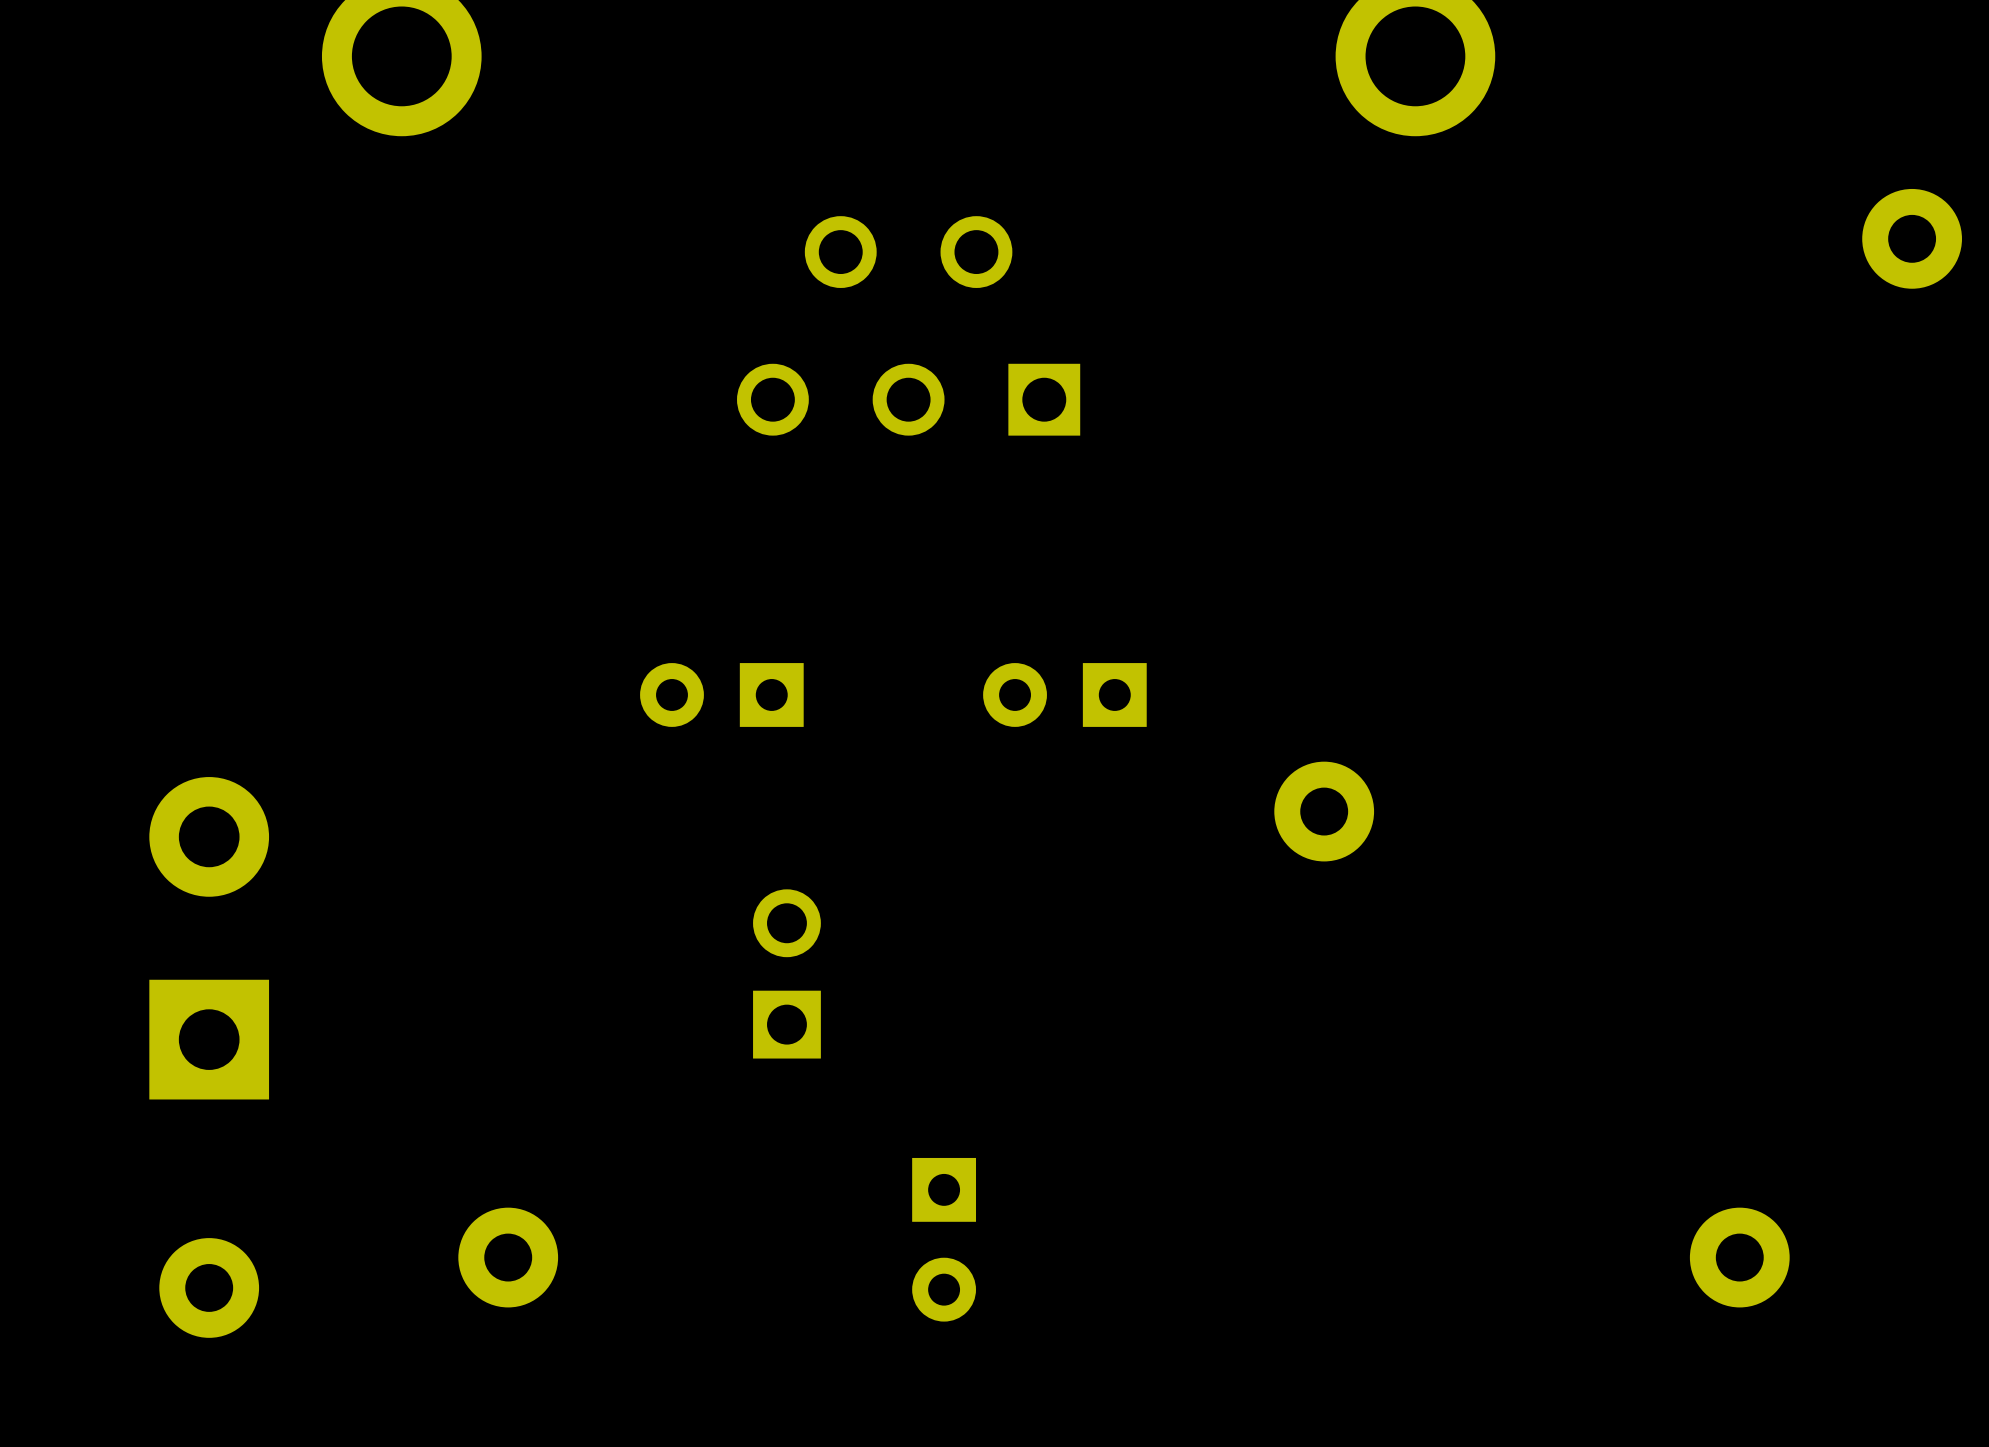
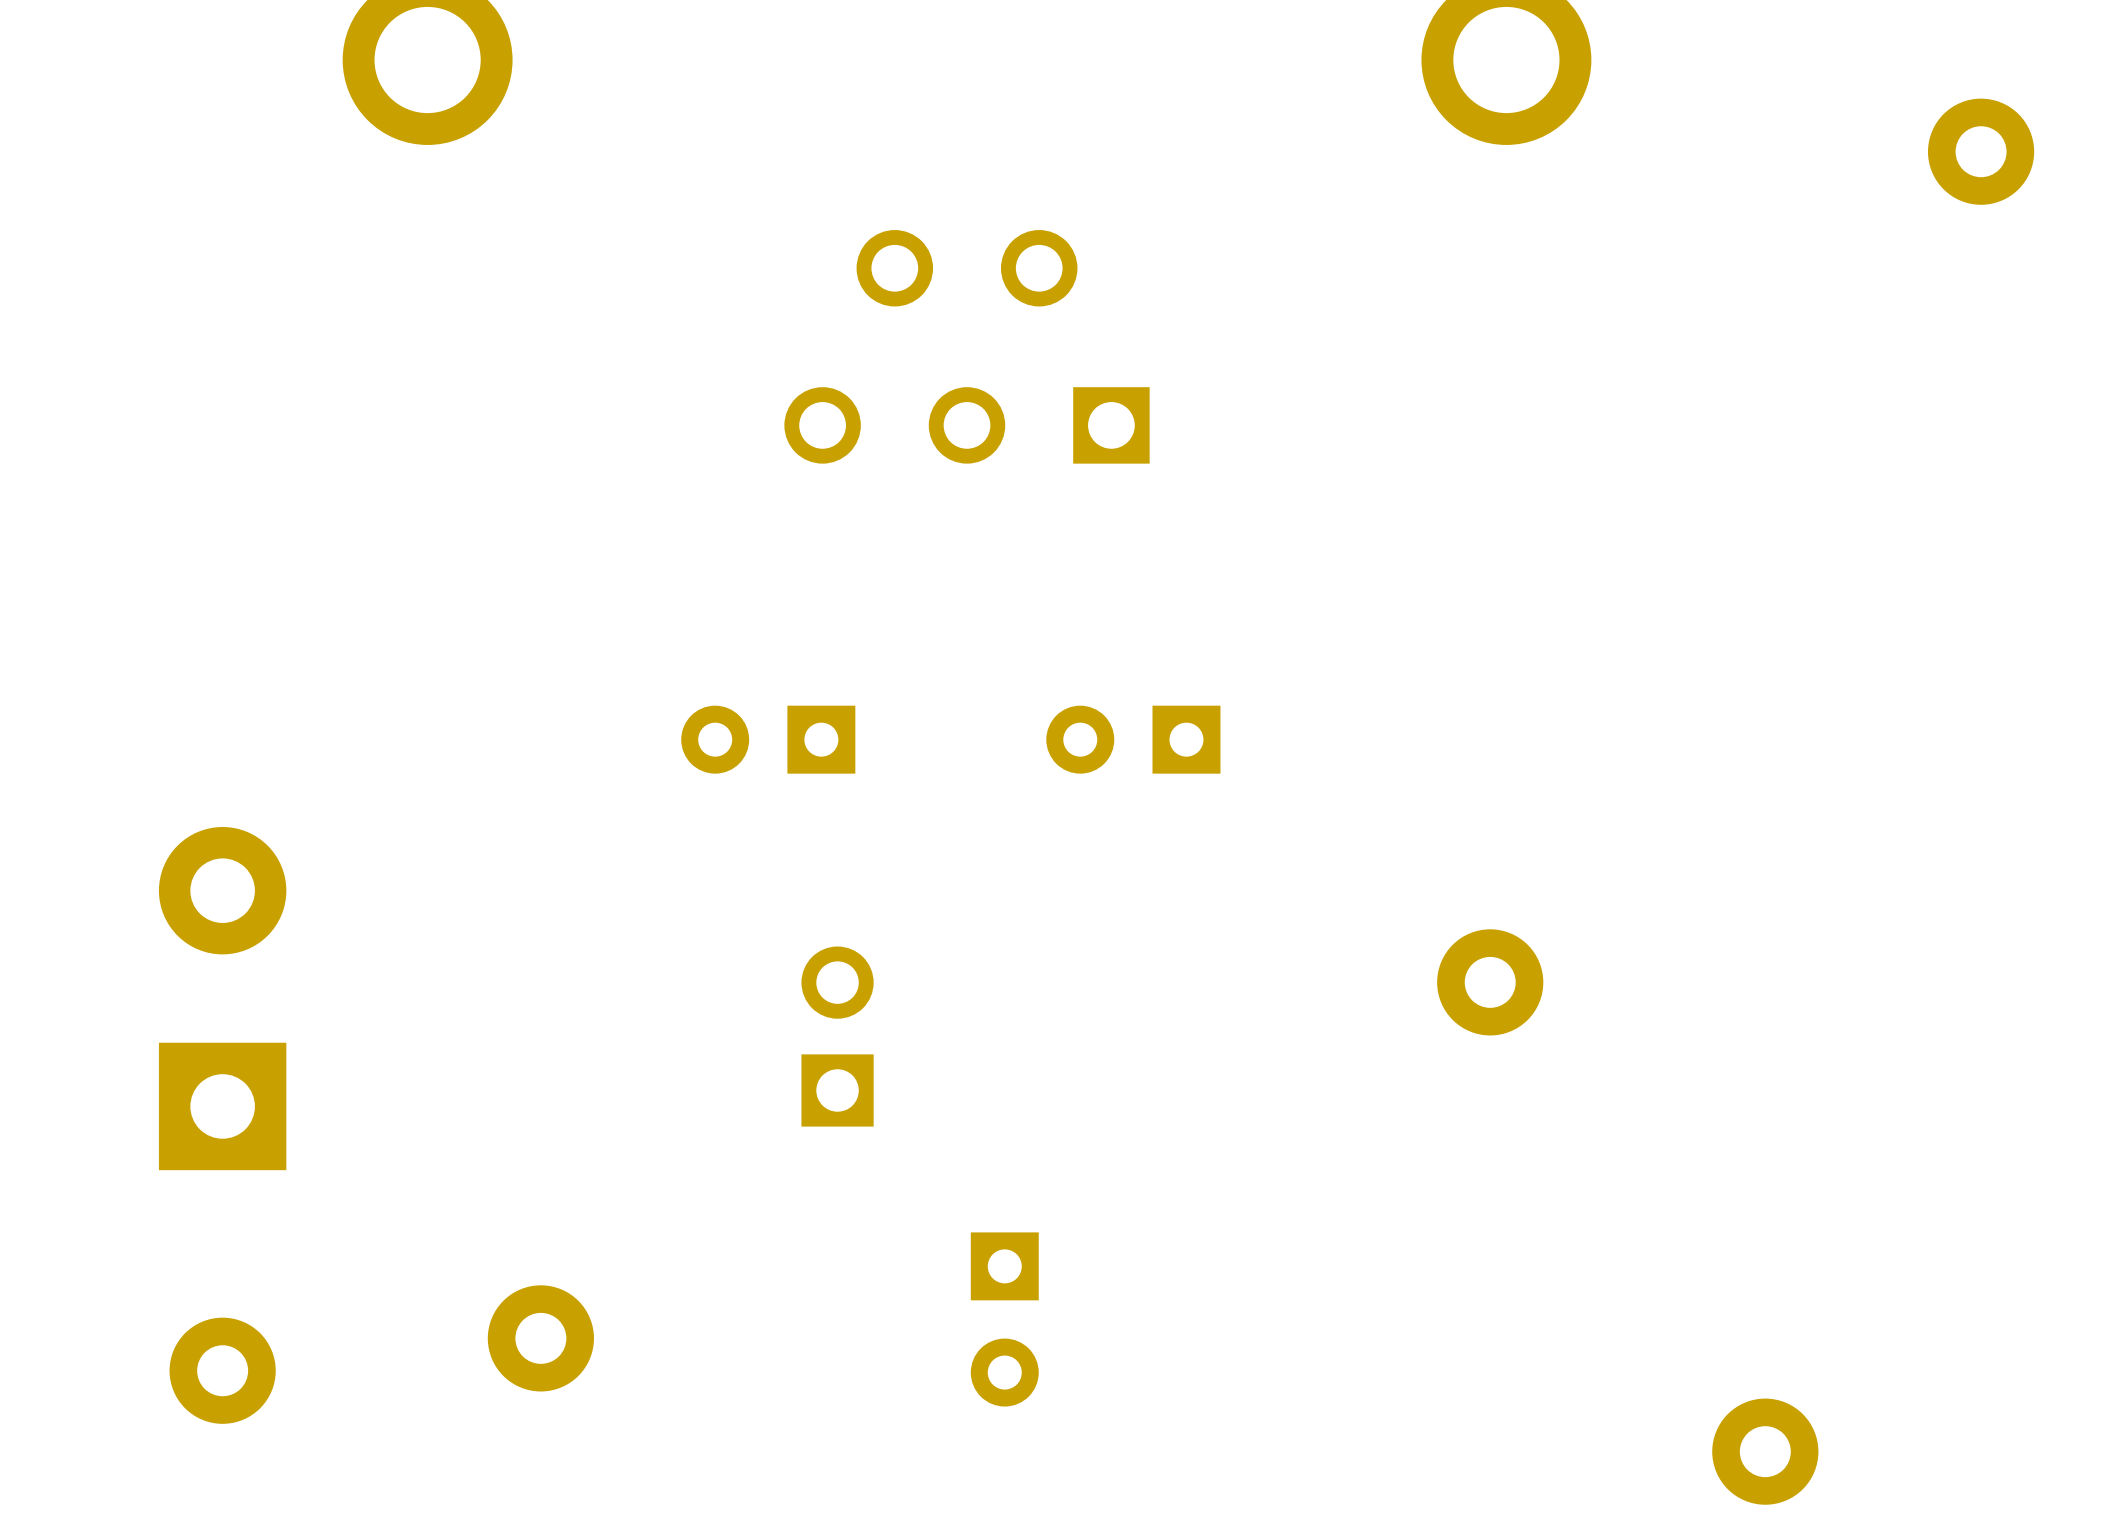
part position: (1912, 238) -> (1981, 151)
part position: (1324, 811) -> (1490, 982)
part position: (1739, 1257) -> (1765, 1451)

